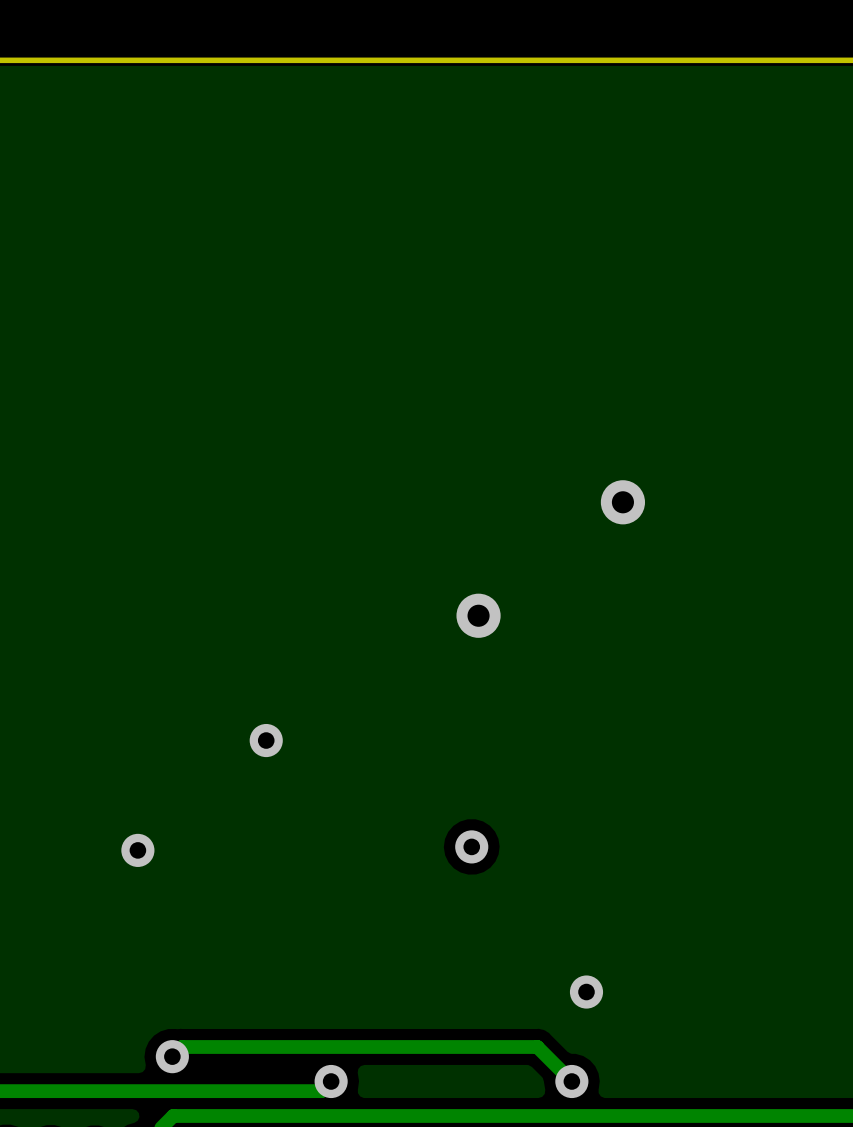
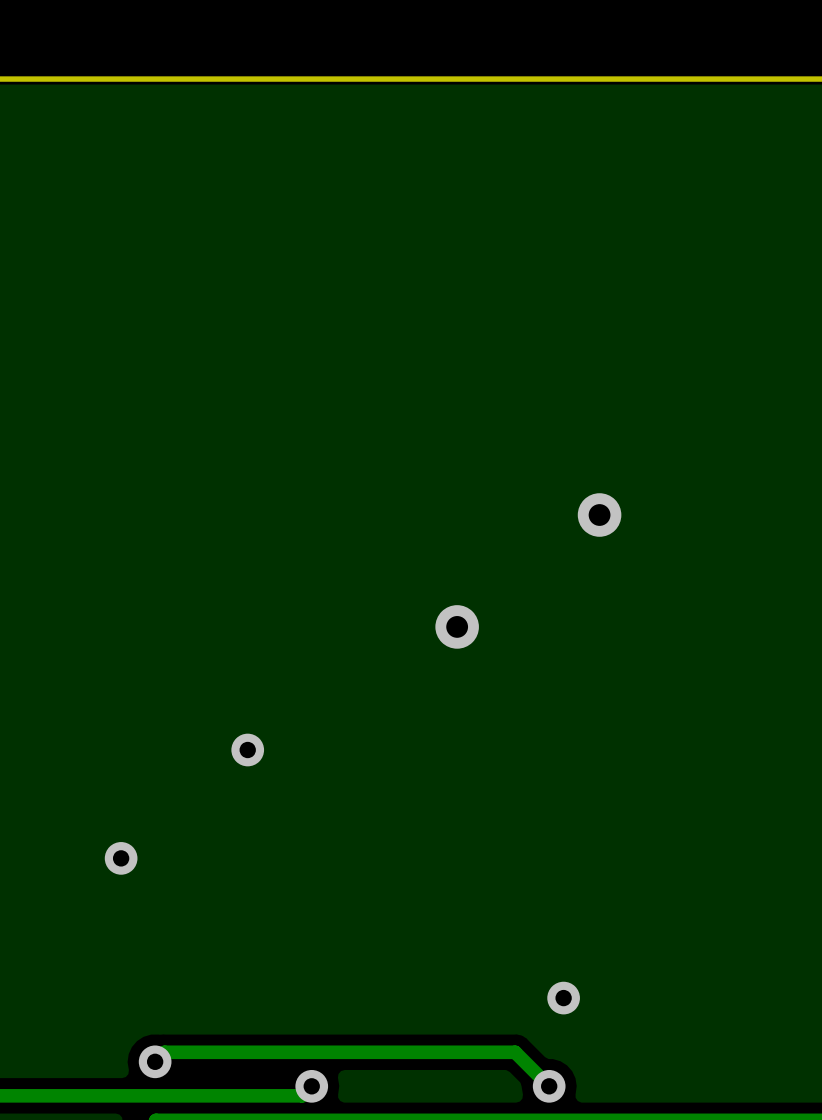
via: (471, 846) -> none

